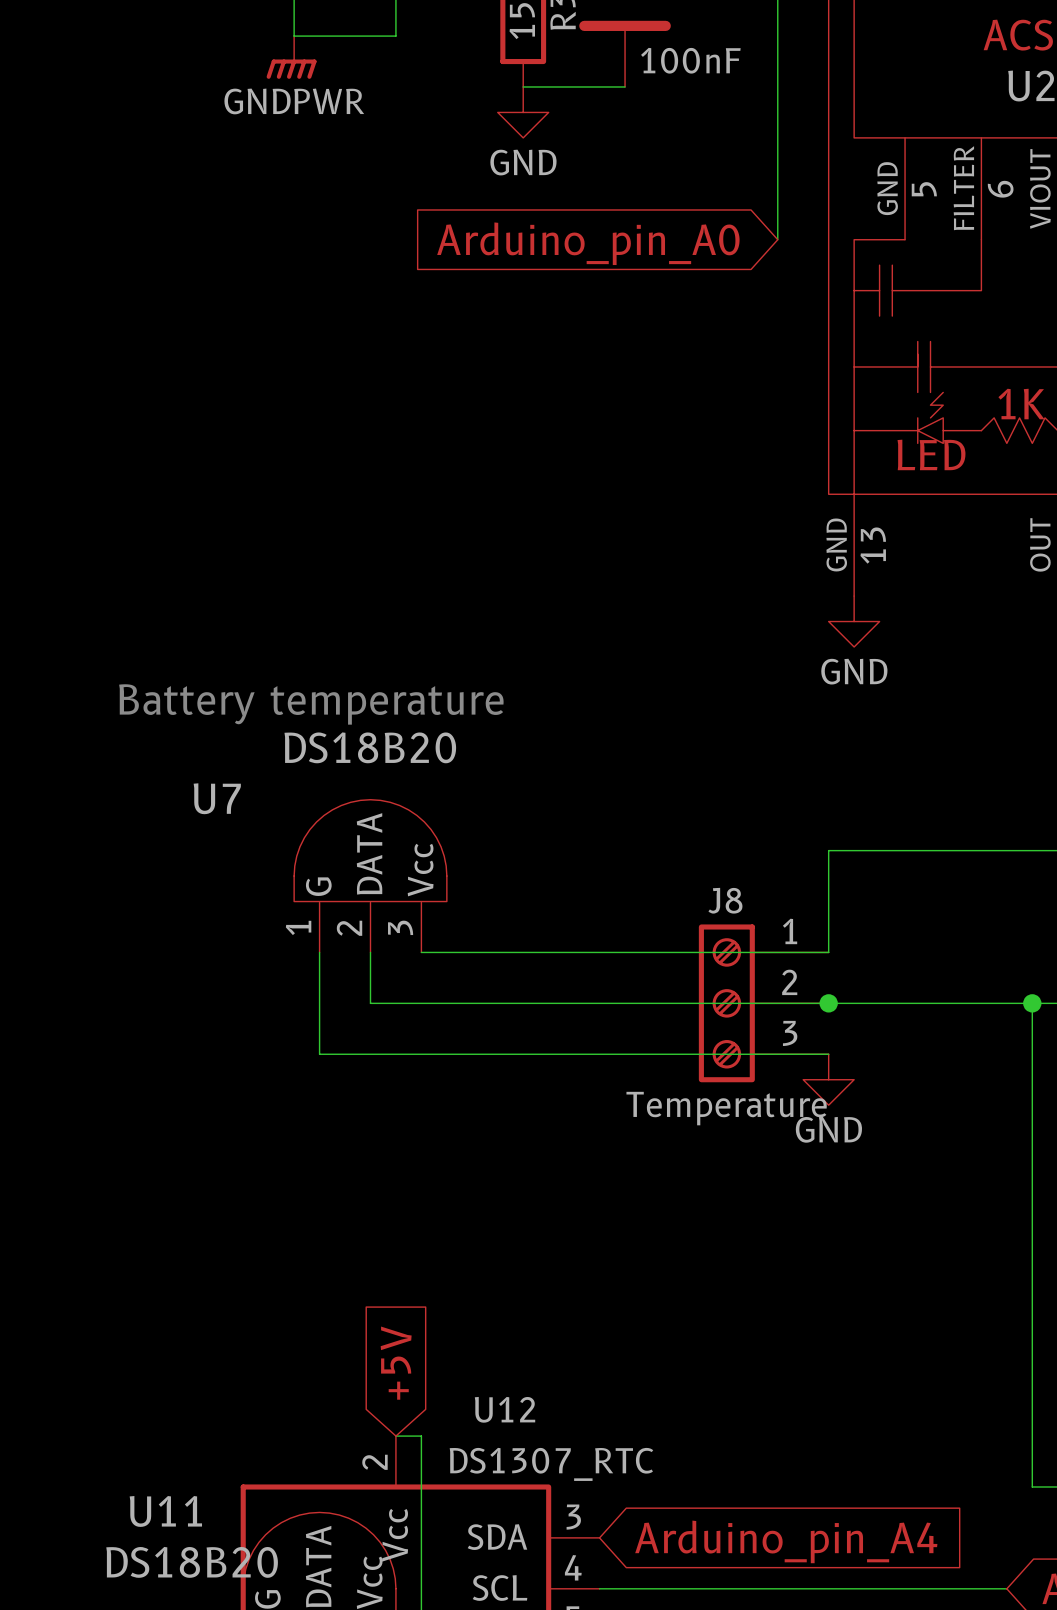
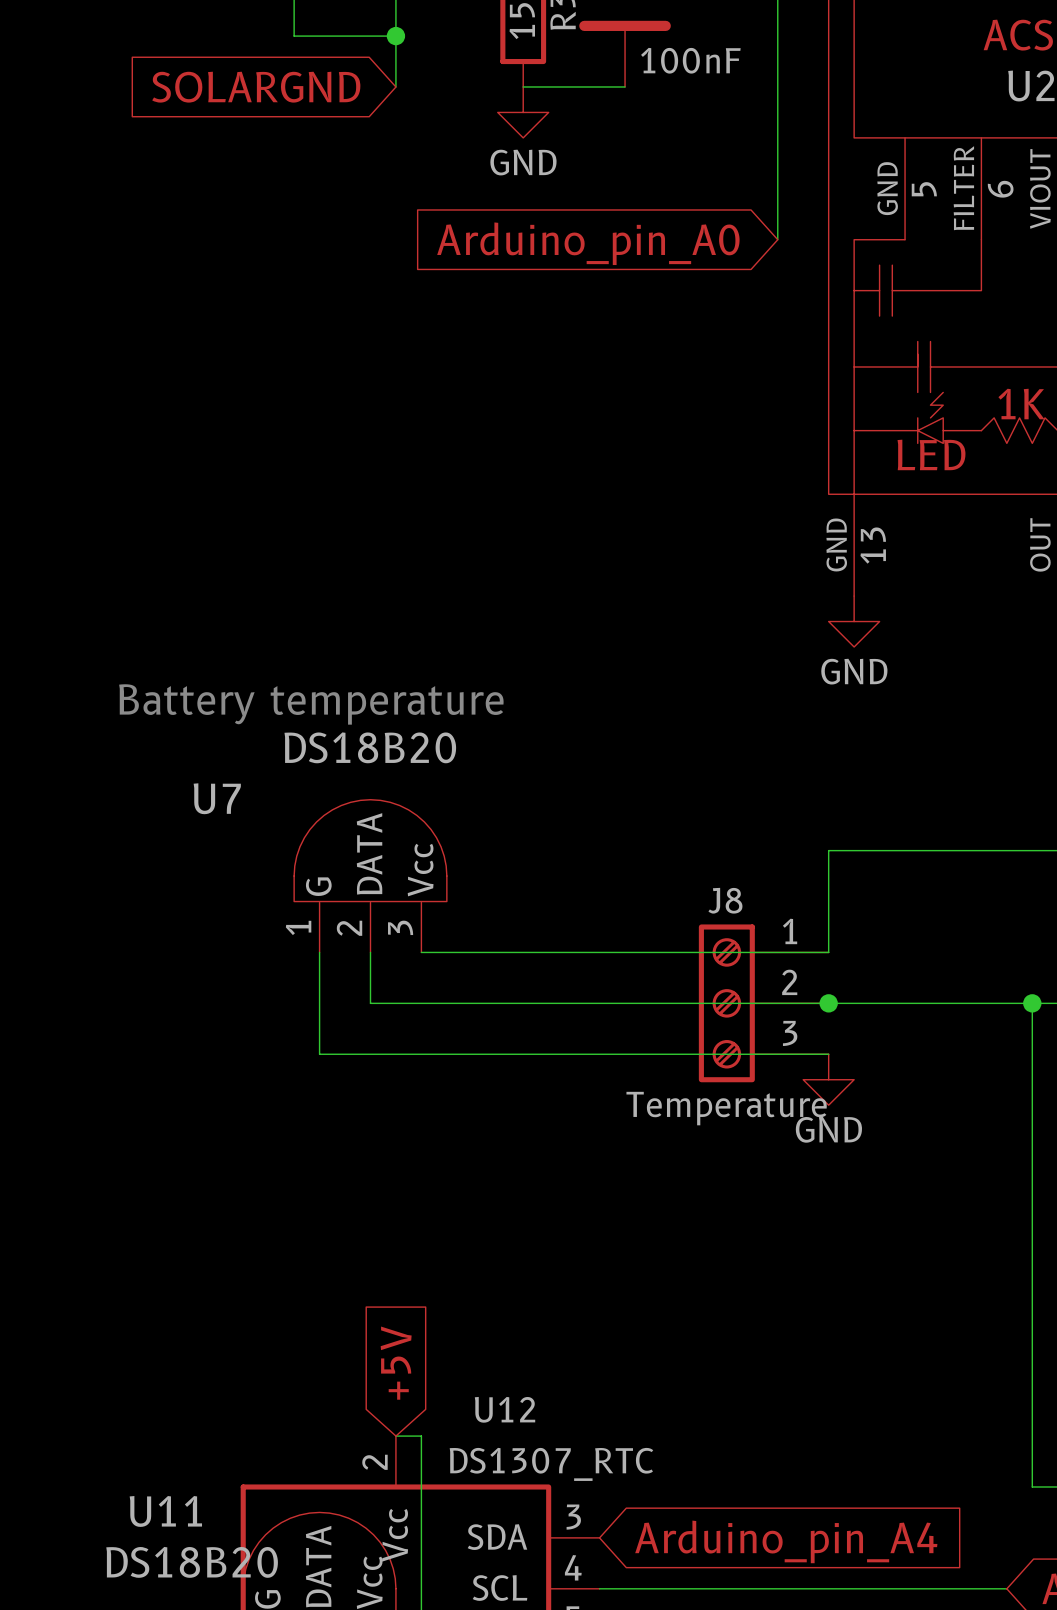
wire: none -> (395, 36) (395, 86)
junction: none -> (395, 36)
power symbol: GNDPWR (291, 57) -> none
global label: none -> SOLARGND (256, 87)

